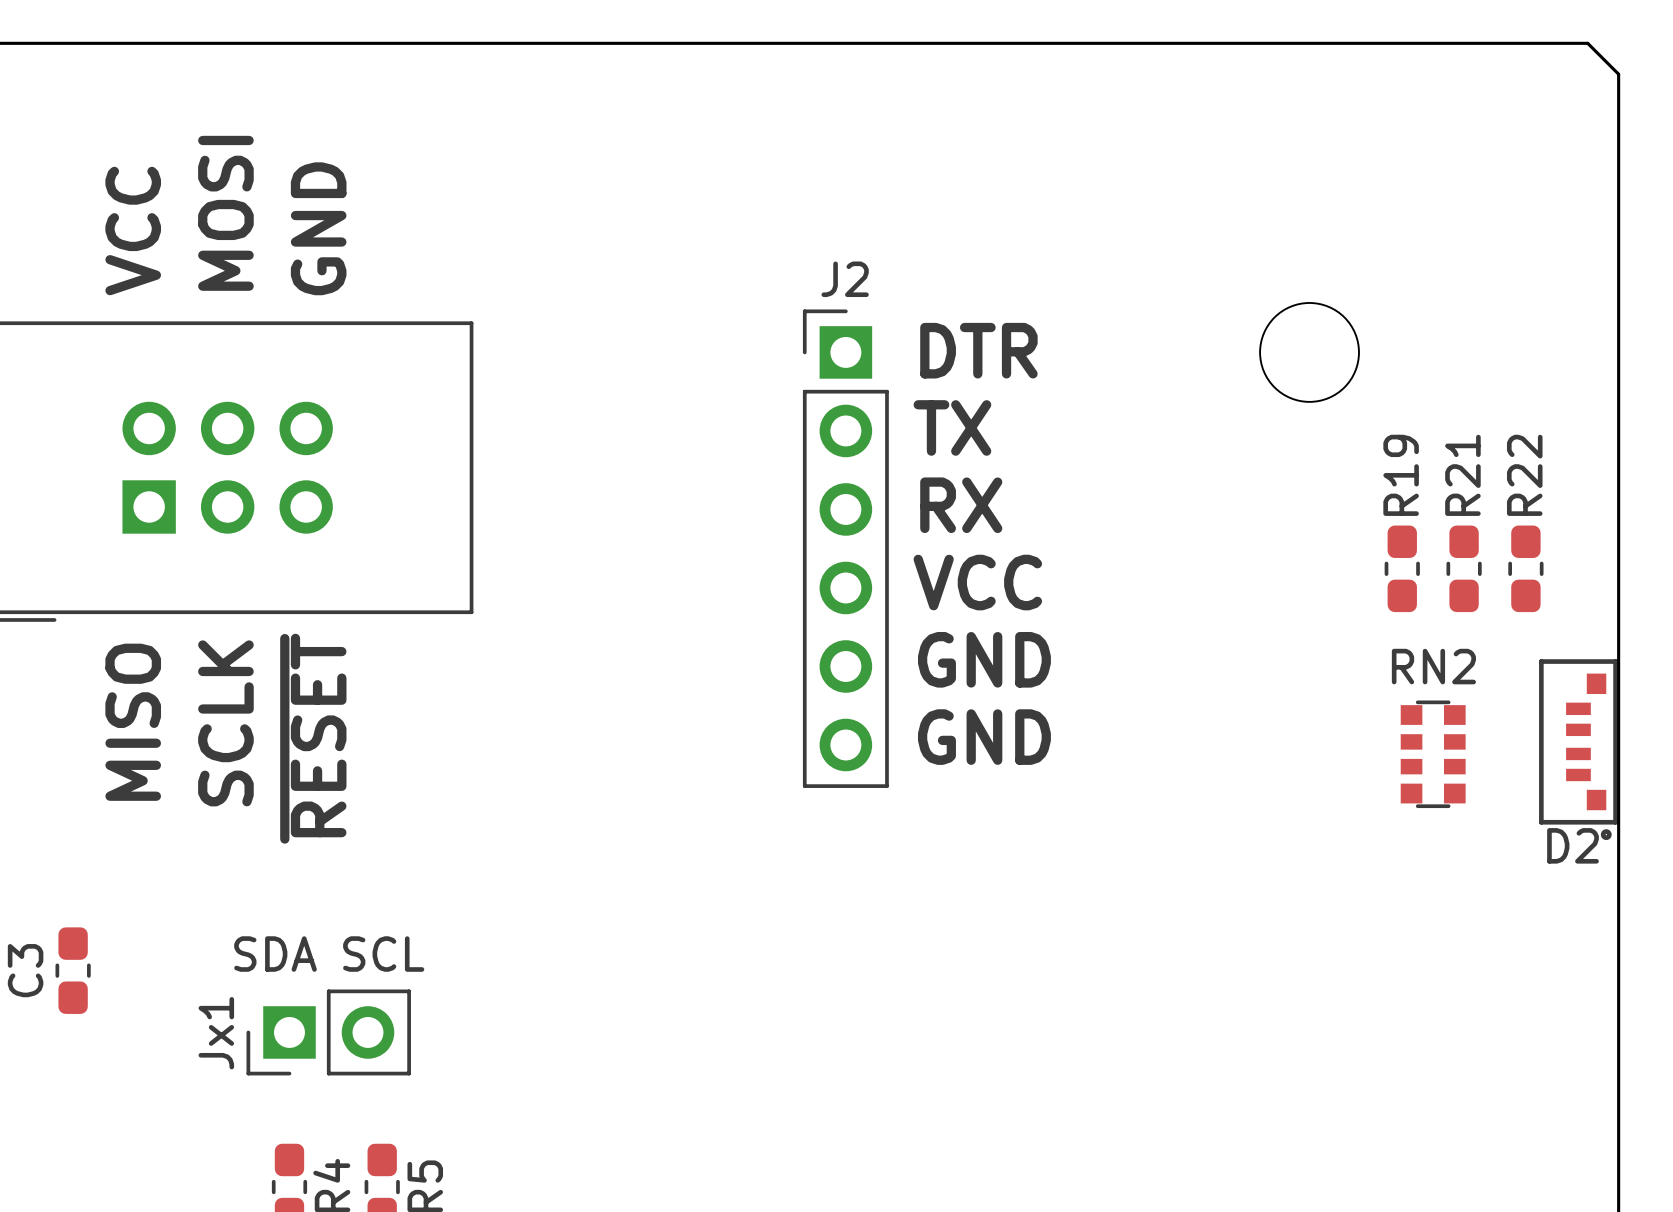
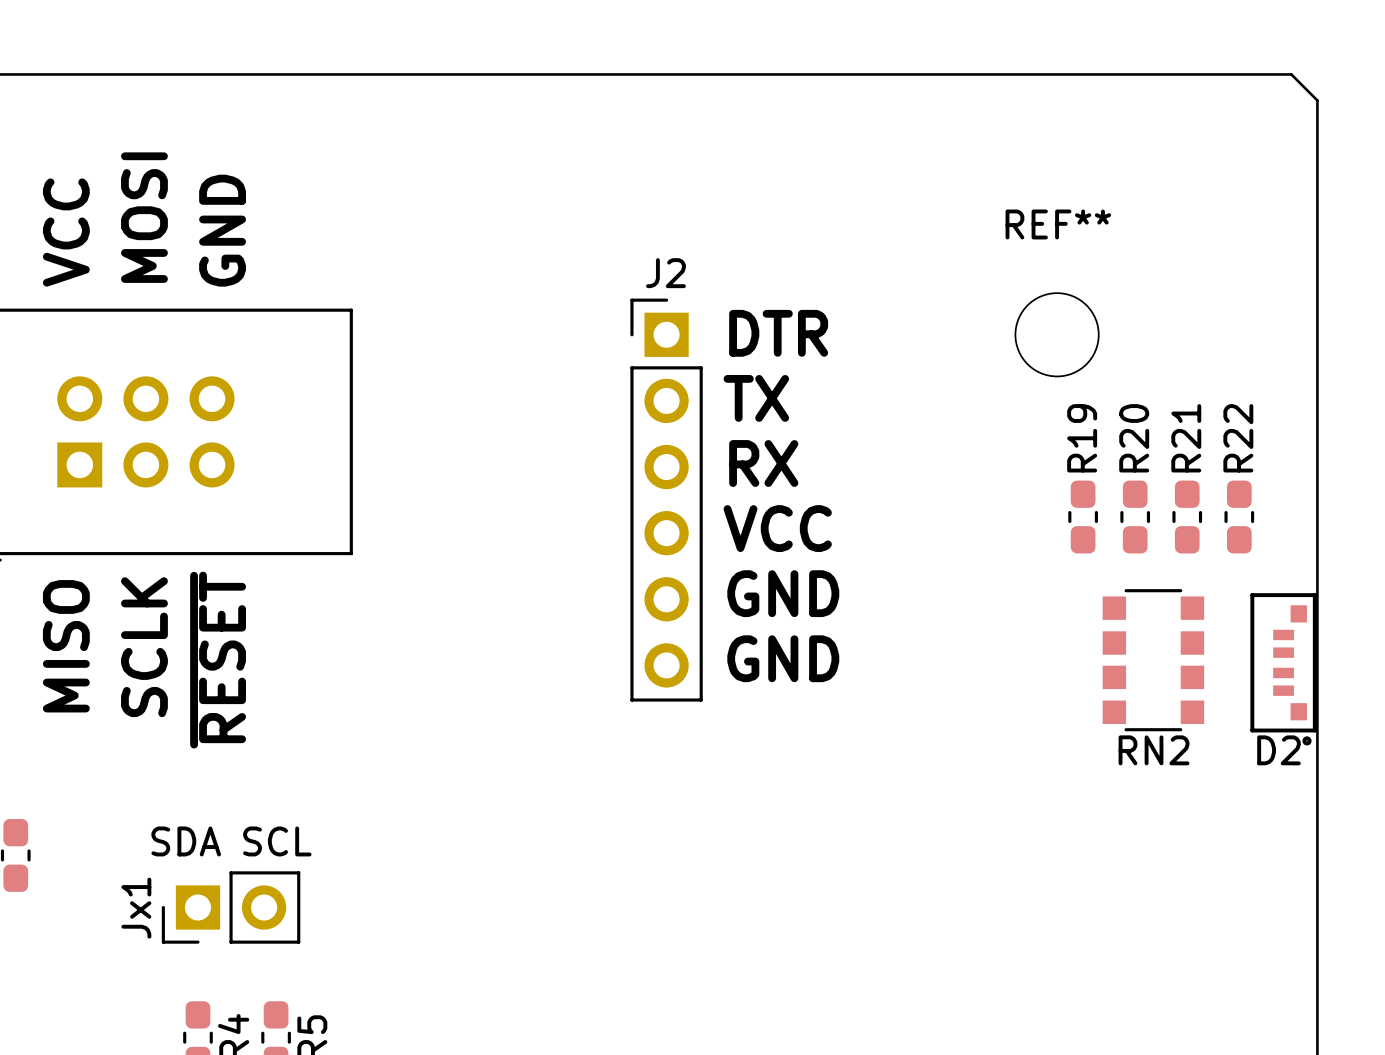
REF** name: none -> REF** (1058, 224)
R19 name: R19 (1401, 475) -> R20 (1134, 438)
R19: none -> (1083, 517)
RN2 name position: RN2 (1433, 666) -> RN2 (1154, 750)
RN2 footprint: [1400, 700, 1466, 809] -> [1102, 589, 1205, 732]

